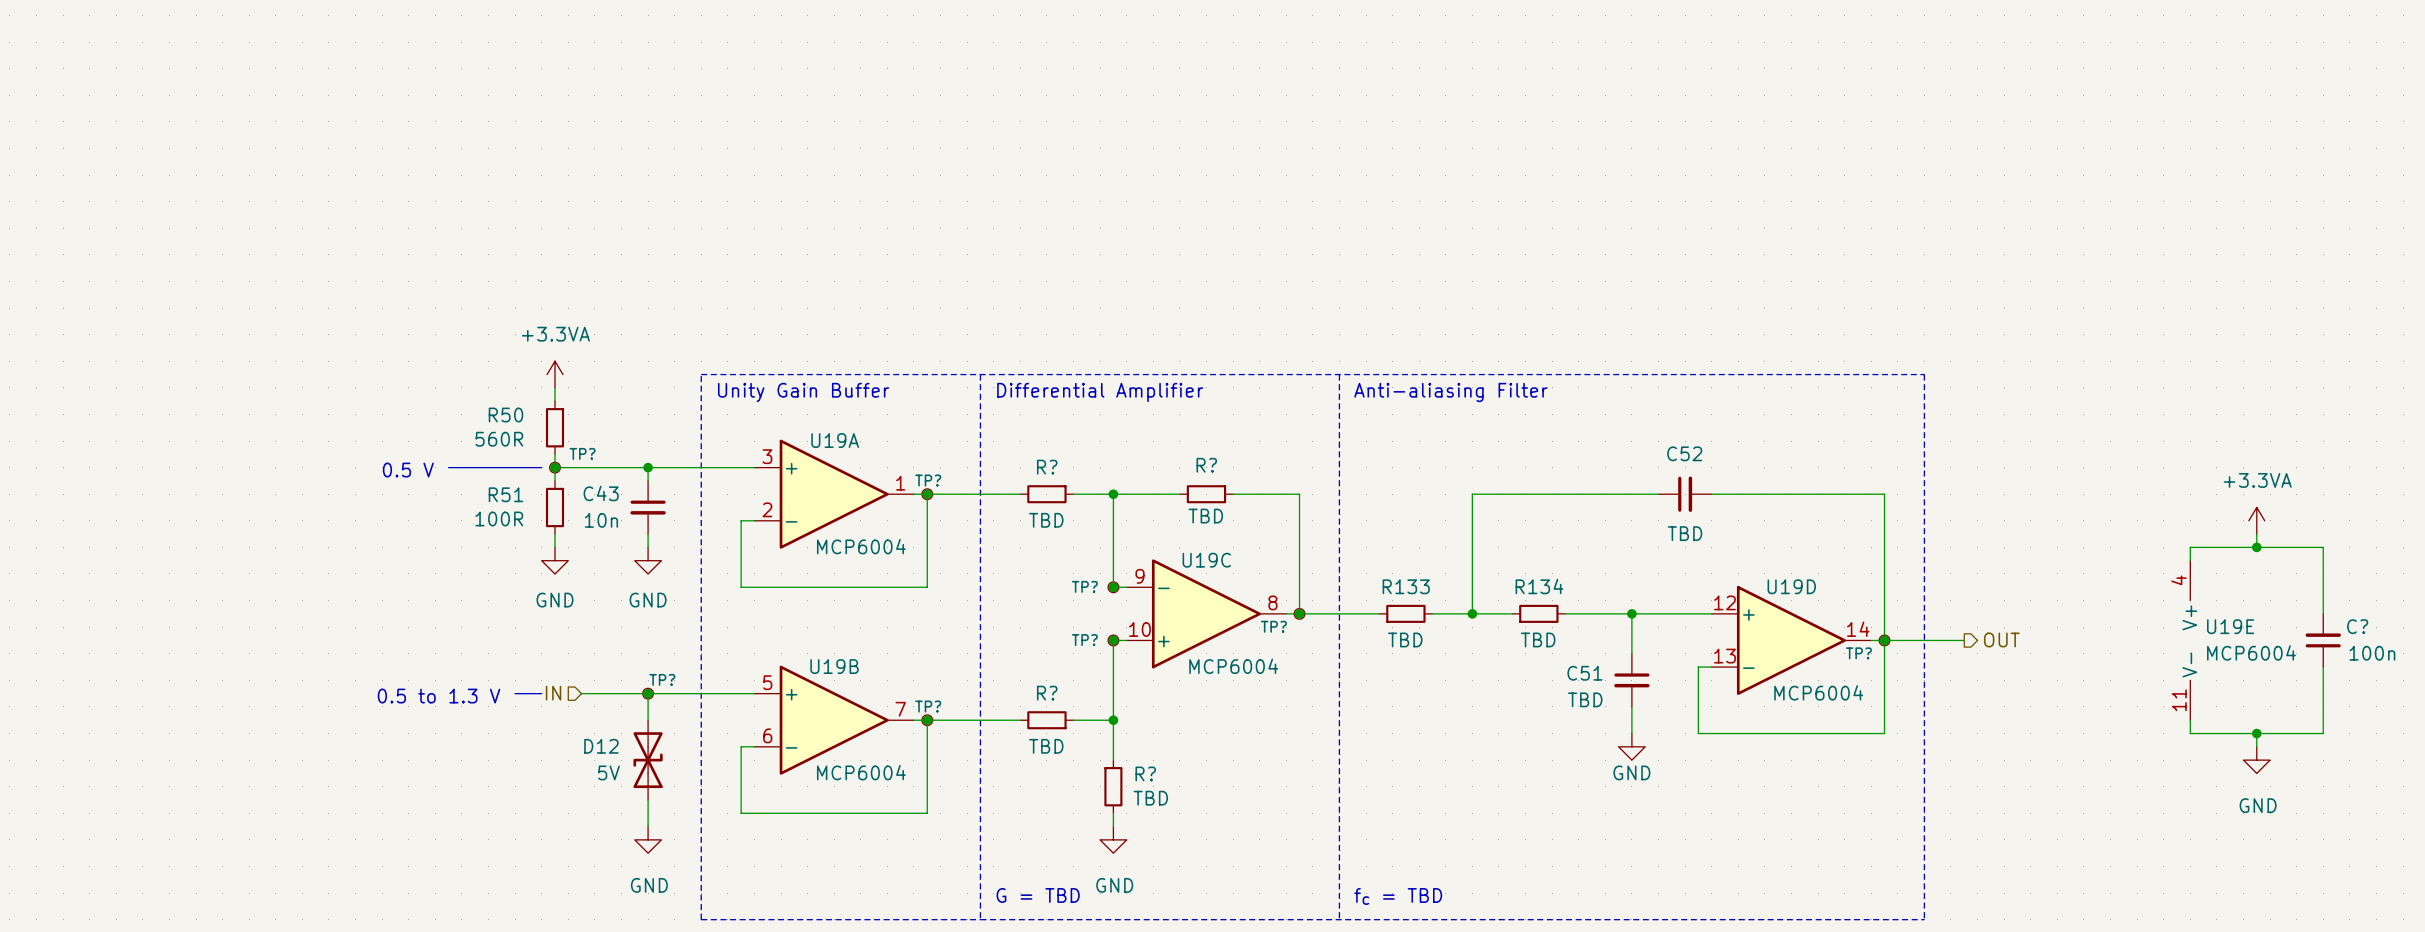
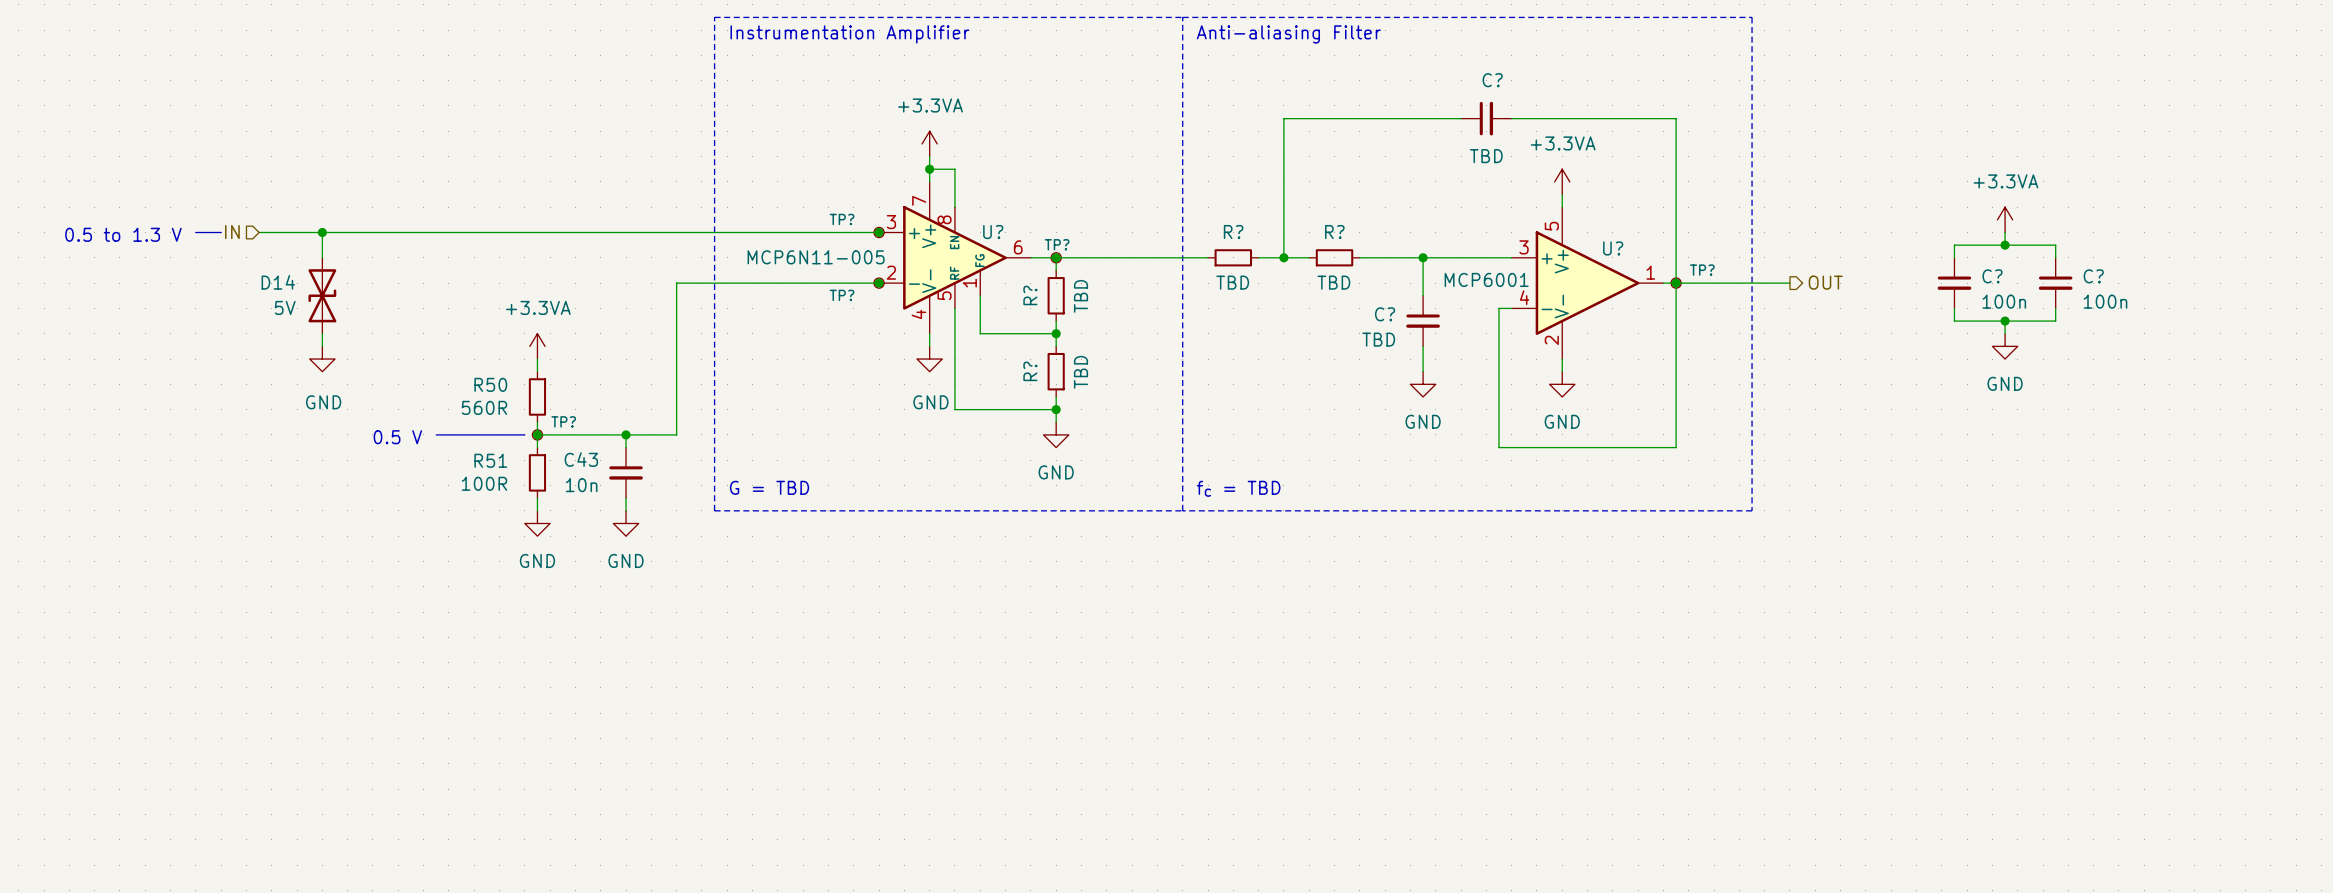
line: none -> (714, 17) (1752, 17) (1752, 510) (714, 510) (714, 17)
line: none -> (1182, 17) (1182, 510)
text: none -> Instrumentation Amplifier (849, 34)
text: none -> Anti-aliasing Filter (1288, 34)
wire: none -> (1461, 118) (1283, 118) (1283, 257)
C?: none -> TBD (1486, 118)
wire: none -> (1511, 118) (1676, 118) (1676, 447) (1498, 447) (1498, 308) (1511, 308)
power symbol: none -> +3.3VA (929, 143)
wire: none -> (929, 156) (929, 181)
wire: none -> (929, 169) (954, 169) (954, 207)
junction: none -> (929, 169)
power symbol: none -> +3.3VA (1562, 181)
wire: none -> (1562, 194) (1562, 207)
power symbol: none -> +3.3VA (2005, 219)
line: none -> (195, 232) (221, 232)
hierarchical label: none -> IN (232, 232)
wire: none -> (259, 232) (879, 232)
wire: none -> (322, 232) (322, 257)
junction: none -> (322, 232)
junction: none -> (879, 232)
TP?: none -> (879, 232)
wire: none -> (2005, 232) (2005, 245)
text: none -> 0.5 to 1.3 V (123, 234)
junction: none -> (2005, 245)
U?: none -> MCP6N11-005 (954, 257)
wire: none -> (1030, 257) (1208, 257)
wire: none -> (1056, 257) (1056, 270)
junction: none -> (1056, 257)
TP?: none -> (1056, 257)
R?: none -> TBD (1233, 257)
wire: none -> (1258, 257) (1309, 257)
junction: none -> (1283, 257)
R?: none -> TBD (1334, 257)
wire: none -> (1359, 257) (1511, 257)
wire: none -> (1423, 257) (1423, 295)
junction: none -> (1423, 257)
wire: none -> (1954, 257) (1954, 245) (2055, 245) (2055, 257)
hierarchical label: none -> OUT (1825, 282)
junction: none -> (879, 283)
TP?: none -> (879, 283)
U?: none -> MCP6001 (1587, 283)
wire: none -> (1663, 283) (1789, 283)
junction: none -> (1676, 283)
TP?: none -> (1676, 283)
C?: none -> 100n (1954, 283)
C?: none -> 100n (2055, 283)
D14: none -> 5V (322, 295)
wire: none -> (980, 295) (980, 333) (1056, 333)
R?: none -> TBD (1056, 295)
wire: none -> (954, 308) (954, 409) (1056, 409)
wire: none -> (1954, 308) (1954, 321) (2055, 321) (2055, 308)
wire: none -> (1056, 321) (1056, 346)
C?: none -> TBD (1423, 321)
junction: none -> (2005, 321)
wire: none -> (322, 333) (322, 346)
wire: none -> (929, 333) (929, 346)
junction: none -> (1056, 333)
line: (701, 374) (701, 919) (1924, 919) (1924, 374) (701, 374) -> none
line: (980, 374) (980, 919) -> none
line: (1339, 374) (1339, 919) -> none
wire: none -> (1423, 346) (1423, 371)
power symbol: none -> GND (2005, 346)
power symbol: none -> GND (322, 359)
power symbol: none -> GND (929, 359)
wire: none -> (1562, 359) (1562, 371)
text: Unity Gain Buffer (803, 392) -> none
text: Differential Amplifier (1100, 392) -> none
text: Anti-aliasing Filter (1450, 392) -> none
R?: none -> TBD (1056, 371)
power symbol: none -> GND (1423, 384)
power symbol: none -> GND (1562, 384)
wire: none -> (1056, 396) (1056, 422)
wire: (701, 467) (754, 467) -> (676, 434) (676, 283) (879, 283)
power symbol: none -> GND (1056, 434)
U19A: MCP6004 (834, 494) -> none
wire: (913, 494) (1020, 494) -> none
wire: (927, 494) (927, 587) (741, 587) (741, 520) (754, 520) -> none
junction: (927, 494) -> none
TP?: (927, 494) -> none
R?: TBD (1046, 494) -> none
wire: (1073, 494) (1179, 494) -> none
wire: (1113, 494) (1113, 587) (1126, 587) -> none
junction position: (1113, 494) -> (1056, 409)
R?: TBD (1206, 494) -> none
wire: (1233, 494) (1299, 494) (1299, 613) -> none
wire: (1658, 494) (1472, 494) (1472, 613) -> none
C52: TBD (1685, 494) -> none
wire: (1711, 494) (1884, 494) (1884, 733) (1698, 733) (1698, 667) (1711, 667) -> none
power symbol: +3.3VA (2256, 520) -> none
text: none -> G = TBD (769, 487)
text: none -> fc = TBD (1238, 488)
wire: (2256, 534) (2256, 547) -> (2005, 321) (2005, 333)
junction: (2256, 547) -> none
wire: (2190, 560) (2190, 547) (2323, 547) (2323, 613) -> none
junction: (1113, 587) -> none
TP?: (1113, 587) -> none
U19C: MCP6004 (1206, 613) -> none
wire: (1286, 613) (1379, 613) -> none
junction: (1299, 613) -> none
TP?: (1299, 613) -> none
R133: TBD (1405, 613) -> none
wire: (1432, 613) (1512, 613) -> none
junction: (1472, 613) -> none
R134: TBD (1538, 613) -> none
wire: (1565, 613) (1711, 613) -> none
wire: (1631, 613) (1631, 653) -> none
junction: (1631, 613) -> none
hierarchical label: OUT (2001, 639) -> none
junction: (1113, 640) -> none
TP?: (1113, 640) -> none
wire: (1126, 640) (1113, 640) (1113, 760) -> none
U19D: MCP6004 (1791, 640) -> none
wire: (1871, 640) (1964, 640) -> none
junction: (1884, 640) -> none
TP?: (1884, 640) -> none
U19E: MCP6004 (2190, 640) -> none
C?: 100n (2323, 640) -> none
wire: (2323, 667) (2323, 733) (2190, 733) (2190, 720) -> none
C51: TBD (1631, 680) -> none
line: (515, 693) (541, 693) -> none
hierarchical label: IN (553, 693) -> none
wire: (581, 693) (754, 693) -> none
wire: (648, 693) (648, 720) -> none
junction: (648, 693) -> none
TP?: (648, 693) -> none
text: 0.5 to 1.3 V (439, 696) -> none
wire: (1631, 706) (1631, 733) -> none
U19B: MCP6004 (834, 720) -> none
wire: (913, 720) (1020, 720) -> none
wire: (927, 720) (927, 813) (741, 813) (741, 746) (754, 746) -> none
junction: (927, 720) -> none
TP?: (927, 720) -> none
R?: TBD (1046, 720) -> none
wire: (1073, 720) (1113, 720) -> none
junction: (1113, 720) -> none
wire: (2256, 733) (2256, 746) -> none
junction: (2256, 733) -> none
power symbol: GND (1631, 746) -> none
D12: 5V (648, 760) -> none
power symbol: GND (2256, 760) -> none
R?: TBD (1113, 786) -> none
wire: (648, 800) (648, 826) -> none
wire: (1113, 813) (1113, 826) -> none
power symbol: GND (648, 839) -> none
power symbol: GND (1113, 839) -> none
text: G = TBD (1038, 895) -> none
text: fc = TBD (1398, 896) -> none

